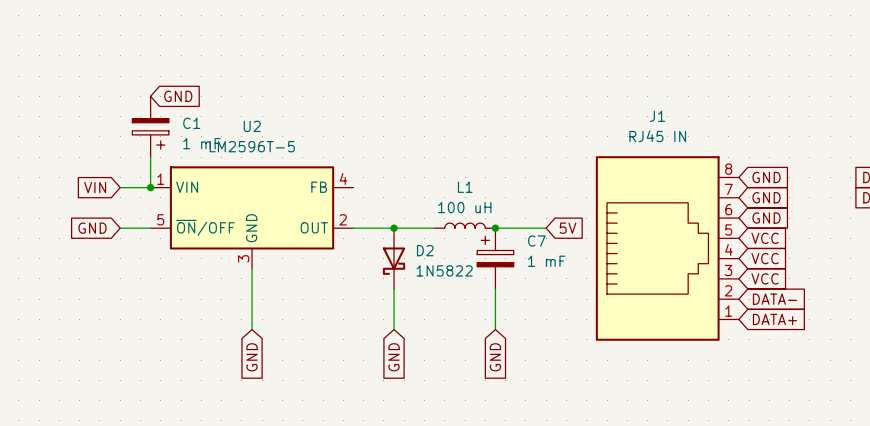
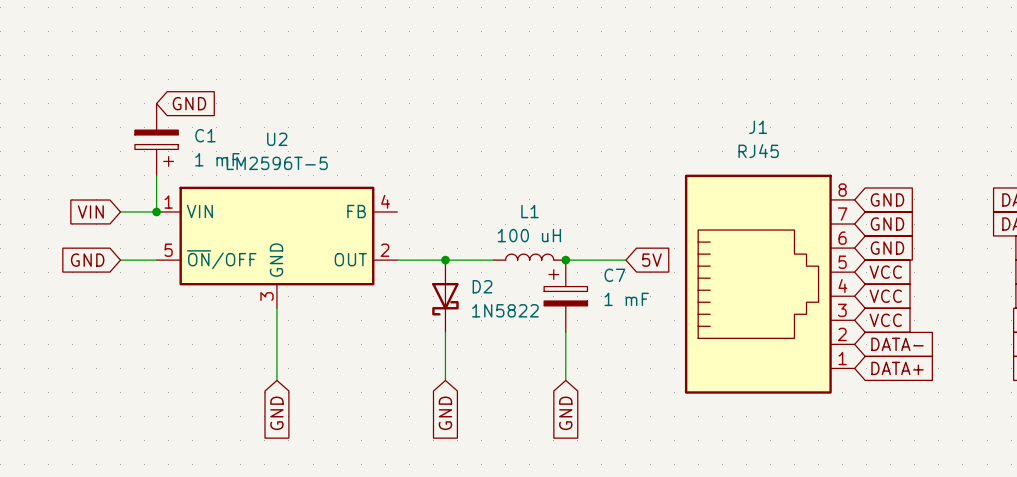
J1 value: RJ45 IN (657, 136) -> RJ45 (758, 151)

